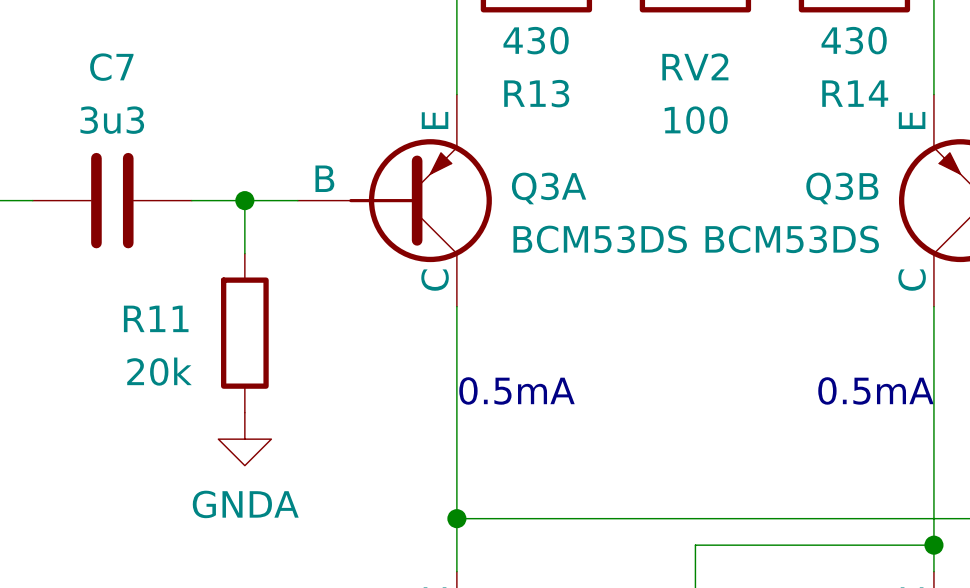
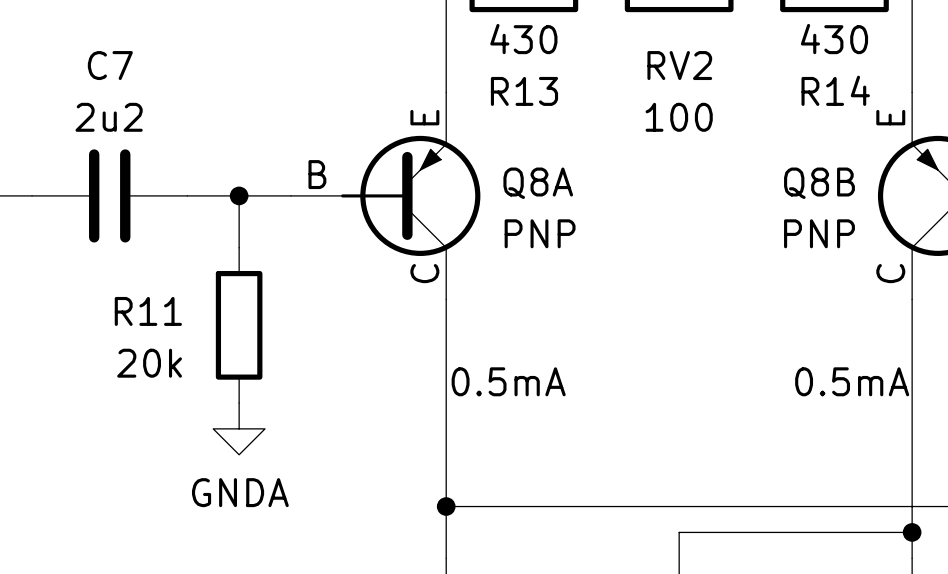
C7 value: 3u3 (112, 120) -> 2u2 (109, 117)
Q3A name: Q3A (549, 188) -> Q8A (538, 183)
Q3B name: Q3B (842, 188) -> Q8B (819, 183)
Q3A value: BCM53DS (600, 239) -> PNP (540, 233)
Q3B value: BCM53DS (792, 239) -> PNP (819, 233)

